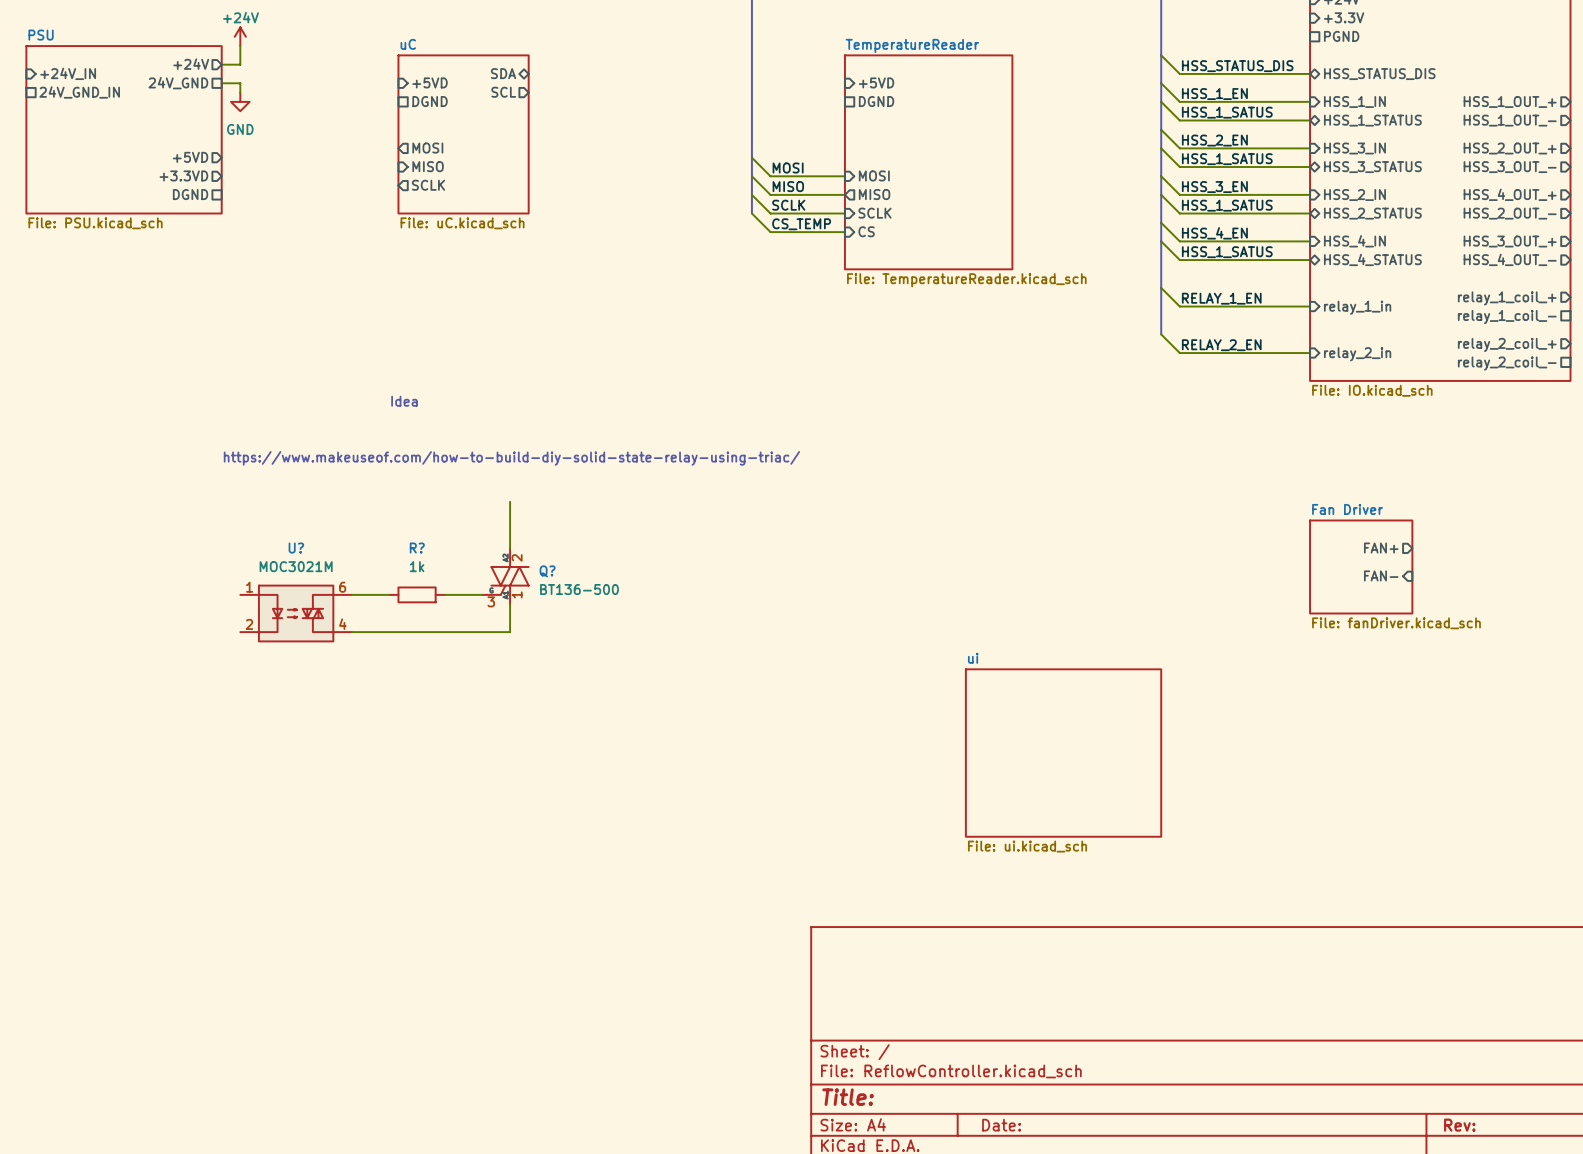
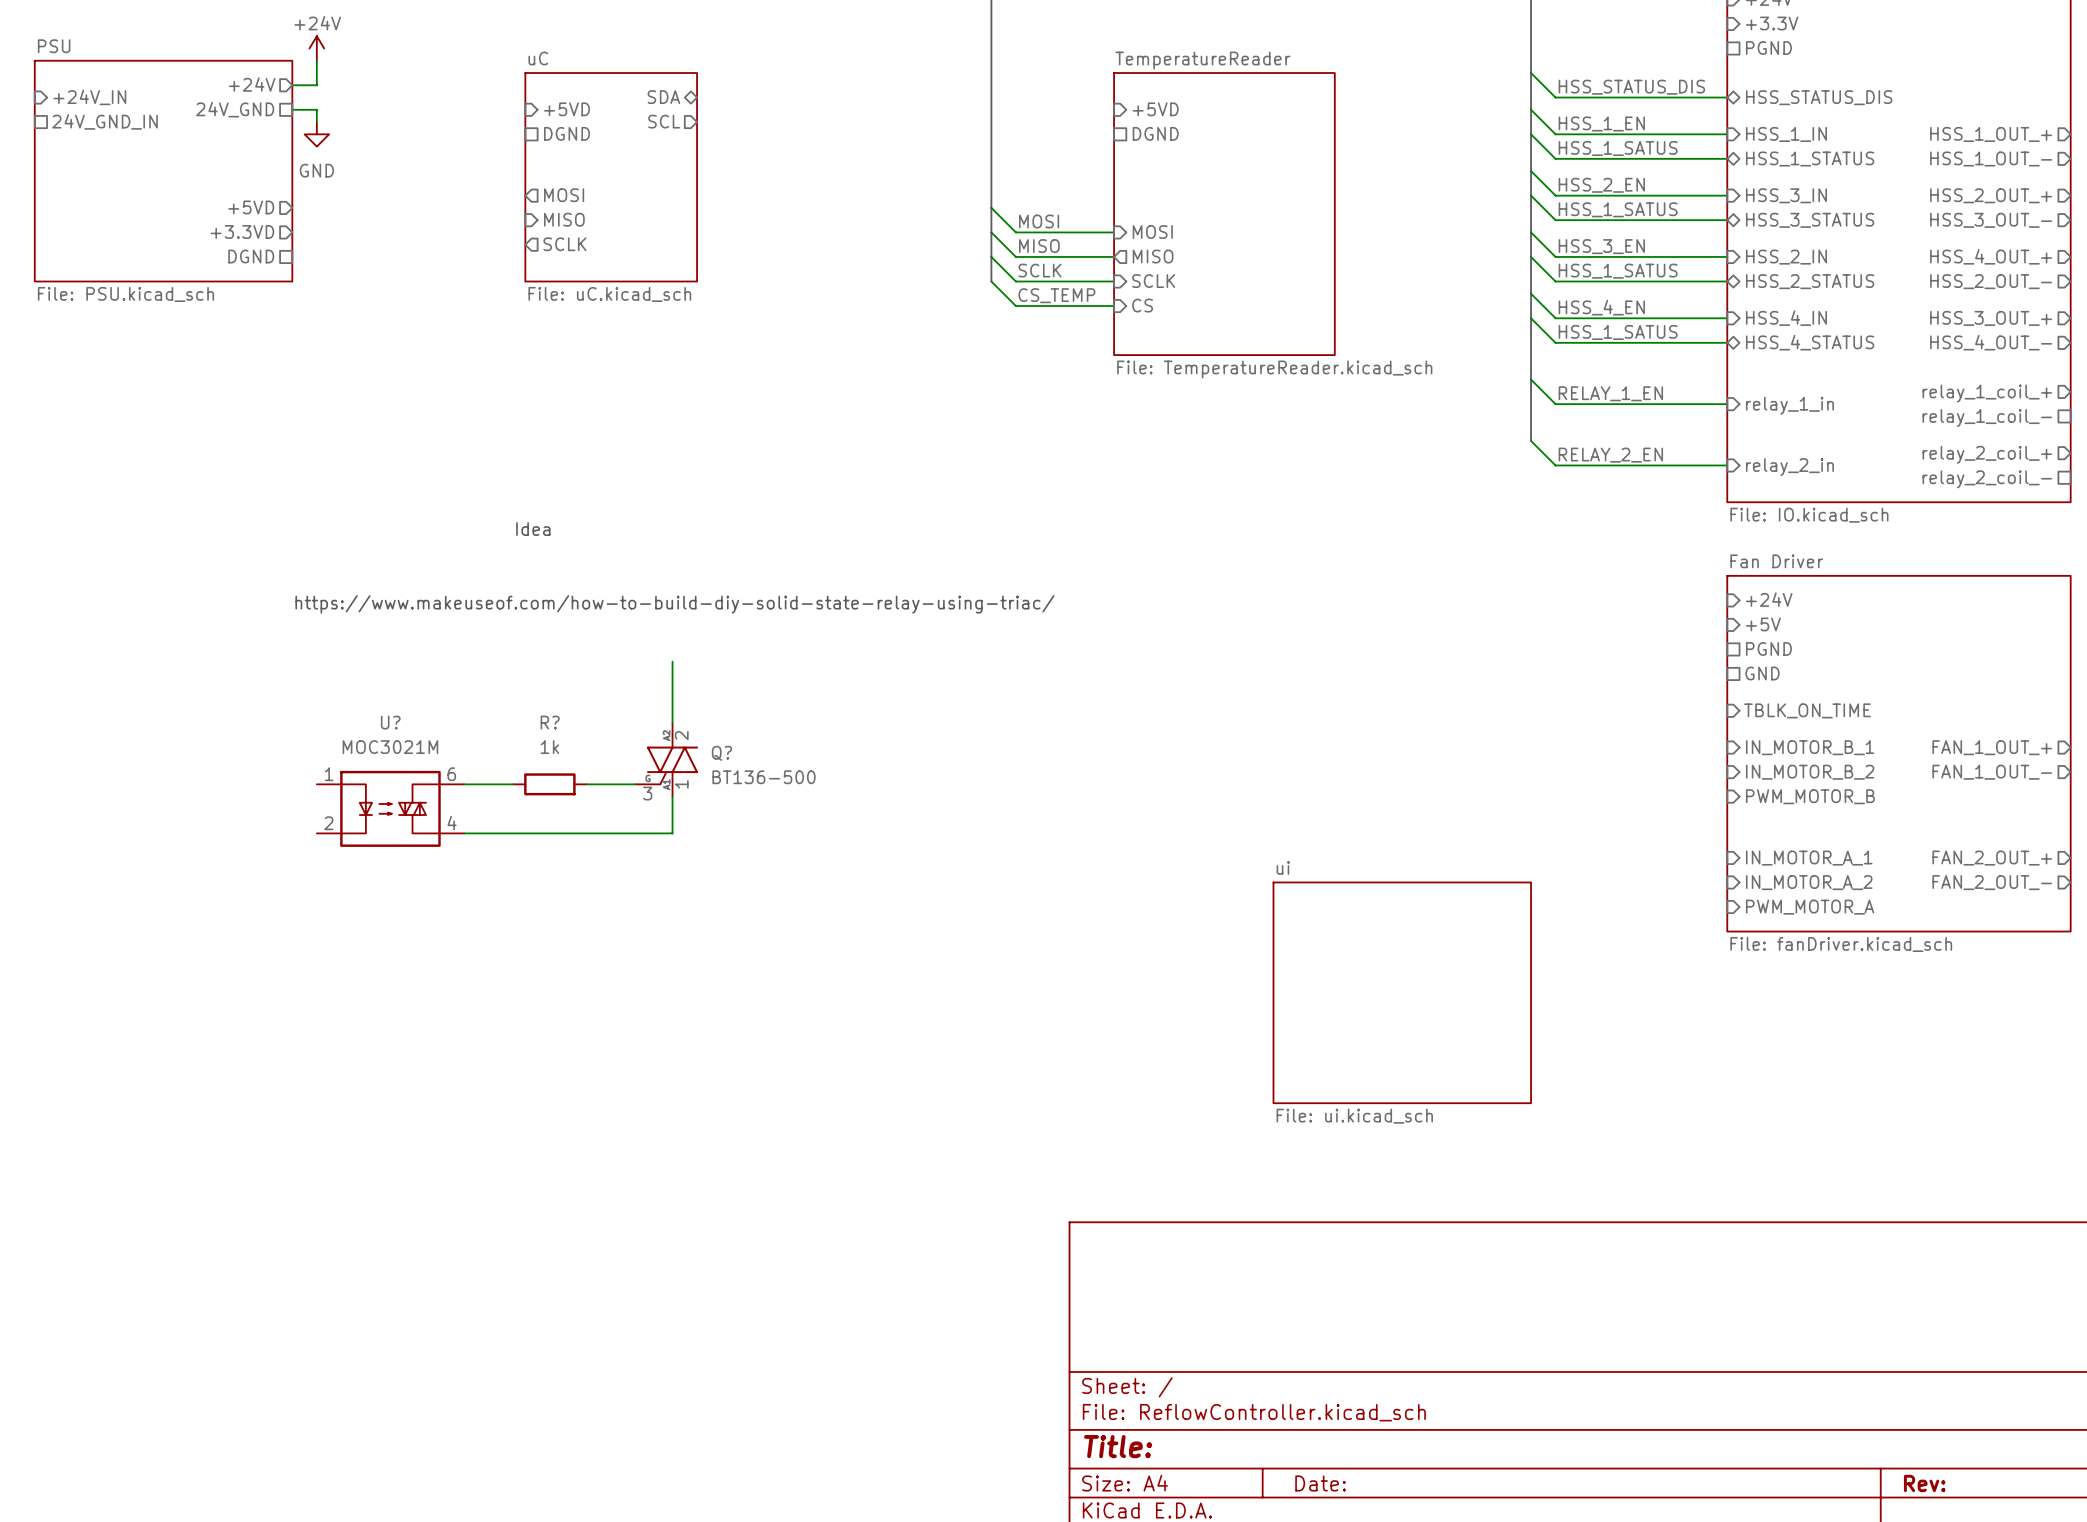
sheet pin: none -> +24V (1769, 599)
sheet pin: none -> +5V (1763, 624)
sheet pin: none -> PGND (1768, 648)
sheet pin: none -> GND (1762, 673)
sheet pin: none -> TBLK_ON_TIME (1807, 710)
sheet pin: FAN+ (1381, 548) -> none
sheet Fan Driver: File: fanDriver.kicad_sch (1361, 566) -> none
sheet pin: none -> IN_MOTOR_B_1 (1810, 747)
sheet pin: none -> FAN_1_OUT_+ (1992, 747)
sheet Fan Driver: none -> File: fanDriver.kicad_sch (1898, 753)
sheet pin: FAN- (1381, 575) -> none
sheet pin: none -> IN_MOTOR_B_2 (1810, 772)
sheet pin: none -> FAN_1_OUT_- (1992, 772)
sheet pin: none -> PWM_MOTOR_B (1810, 796)
sheet pin: none -> IN_MOTOR_A_1 (1809, 858)
sheet pin: none -> FAN_2_OUT_+ (1992, 858)
sheet pin: none -> IN_MOTOR_A_2 (1809, 882)
sheet pin: none -> FAN_2_OUT_- (1992, 882)
sheet pin: none -> PWM_MOTOR_A (1810, 907)

